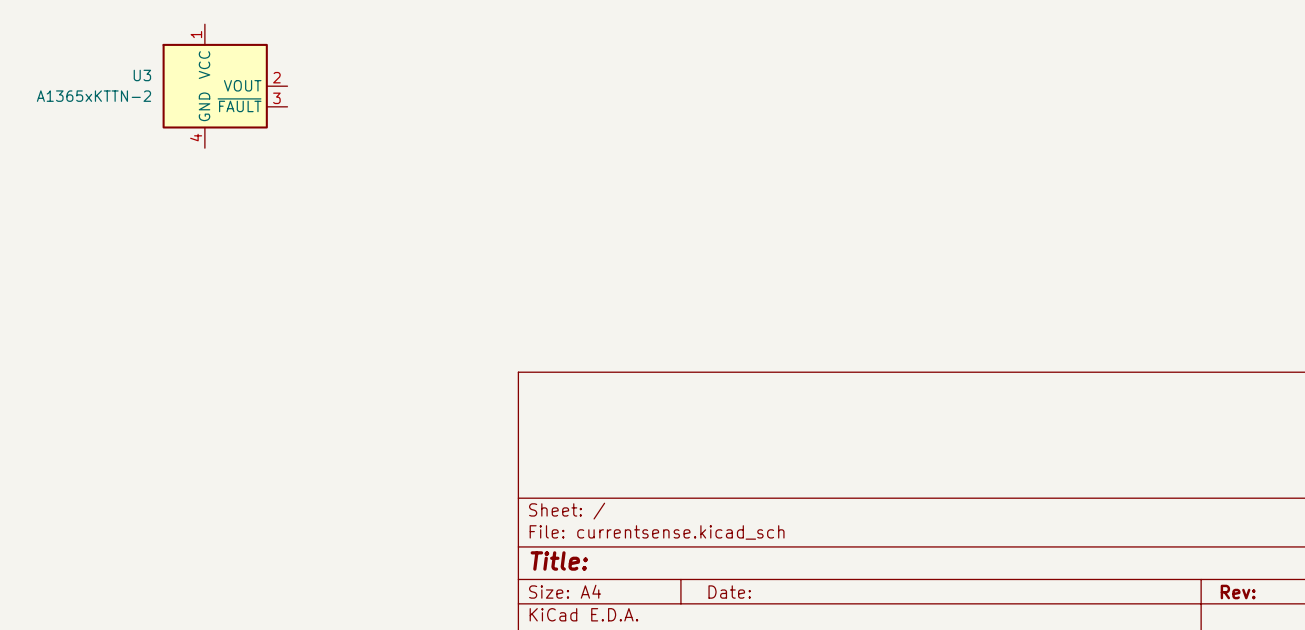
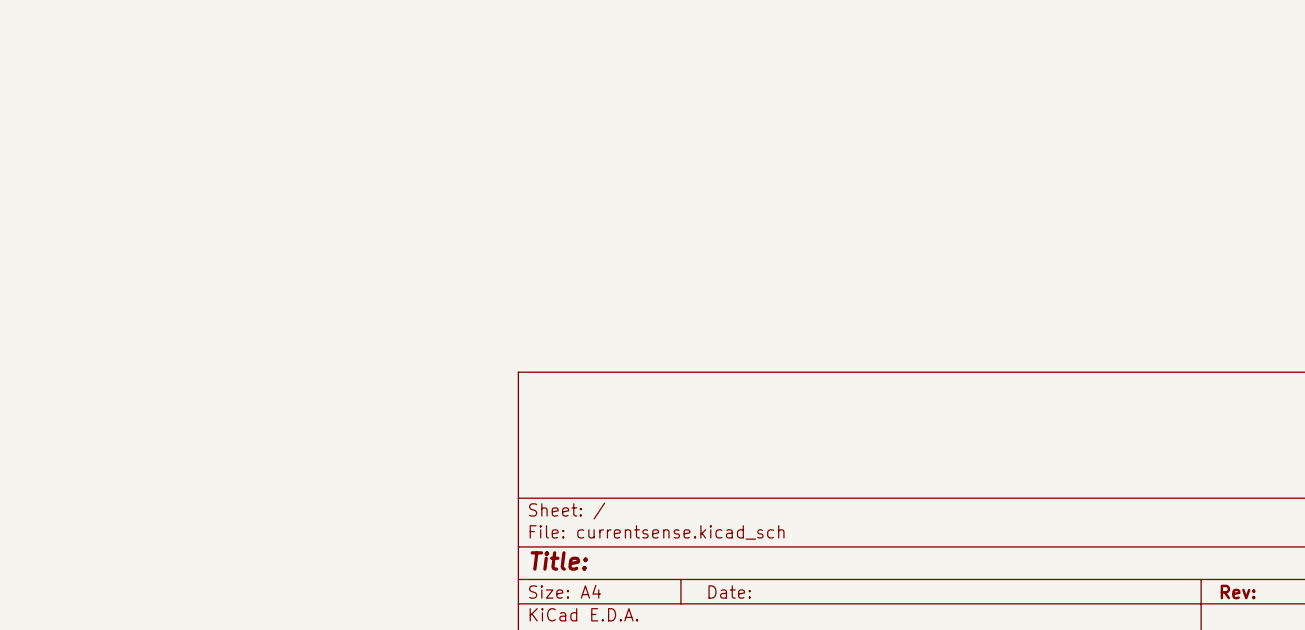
U3: A1365xKTTN-2 (225, 86) -> none

